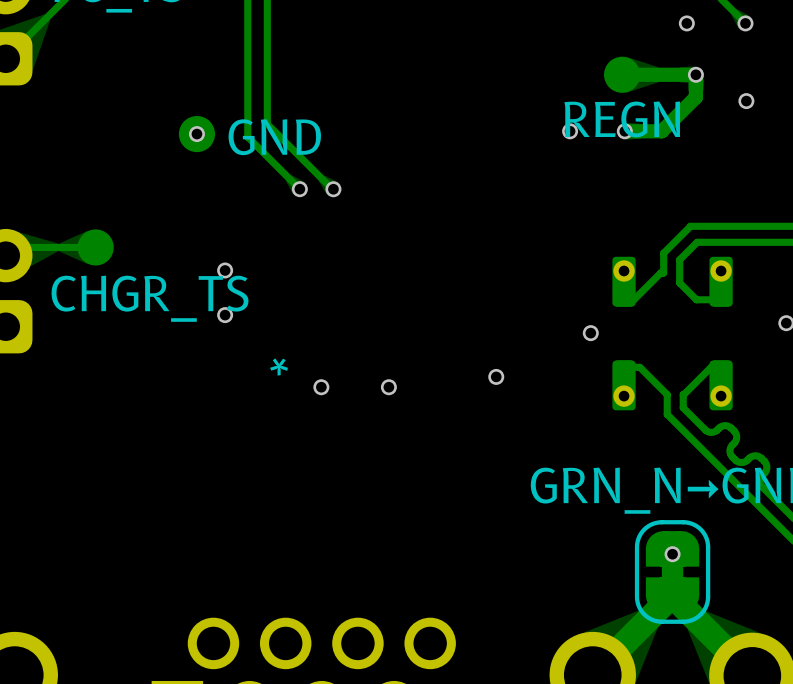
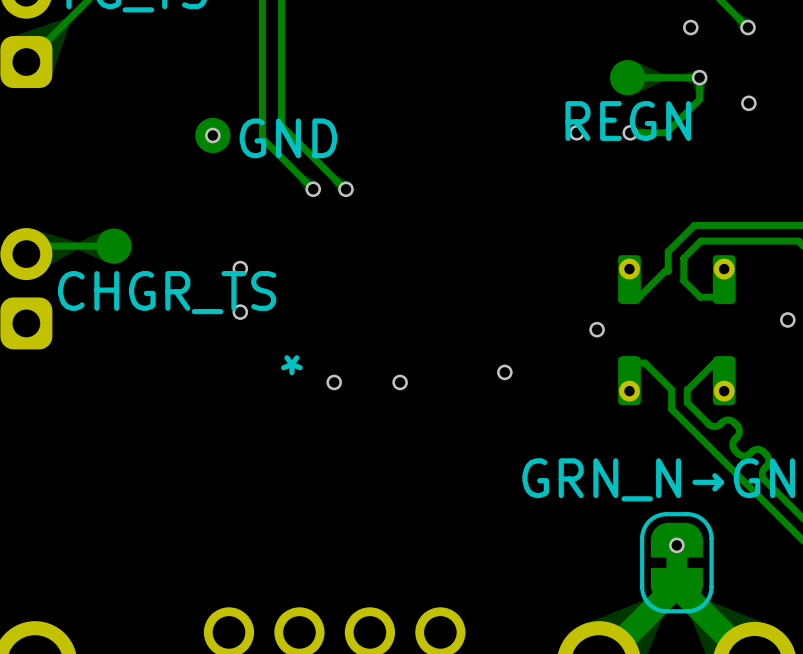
track width: thick (622, 74) (695, 74) (695, 97) (661, 131) (624, 131) -> thin (627, 77) (699, 77) (699, 99) (666, 132) (630, 132)

